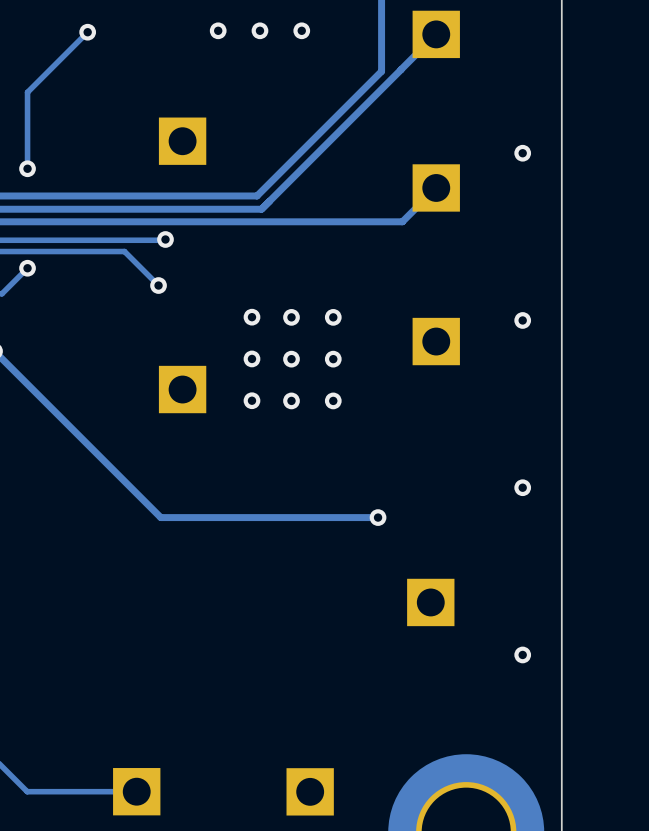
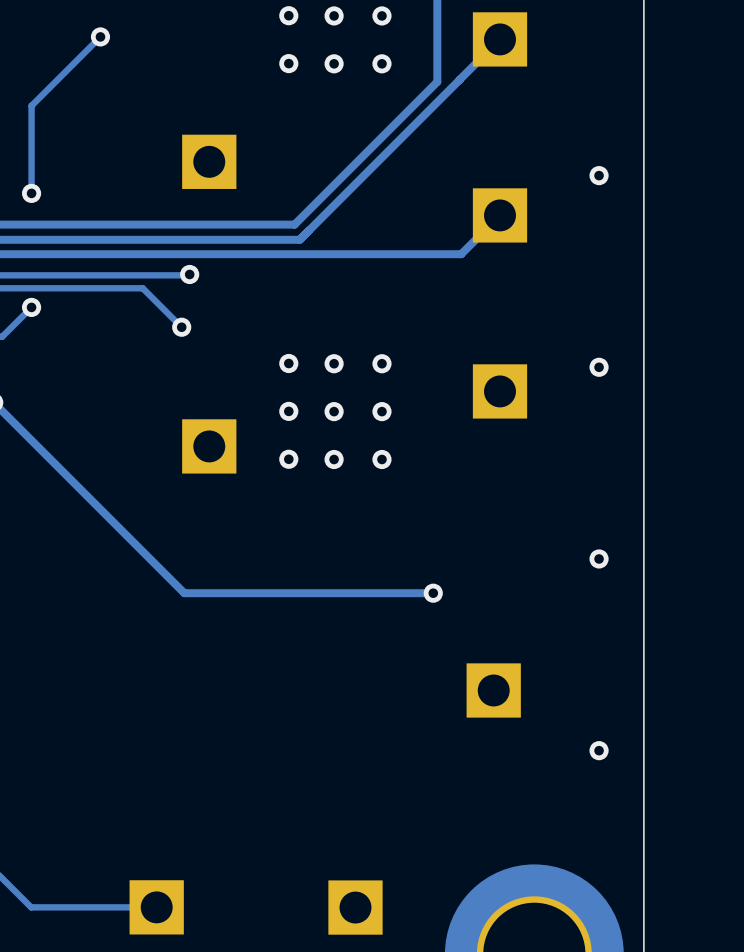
via: none -> (288, 15)
via: none -> (334, 15)
via: none -> (381, 15)
via: (218, 30) -> none
via: (259, 30) -> none
via: (301, 30) -> none
via: none -> (288, 63)
via: none -> (334, 63)
via: none -> (381, 63)

